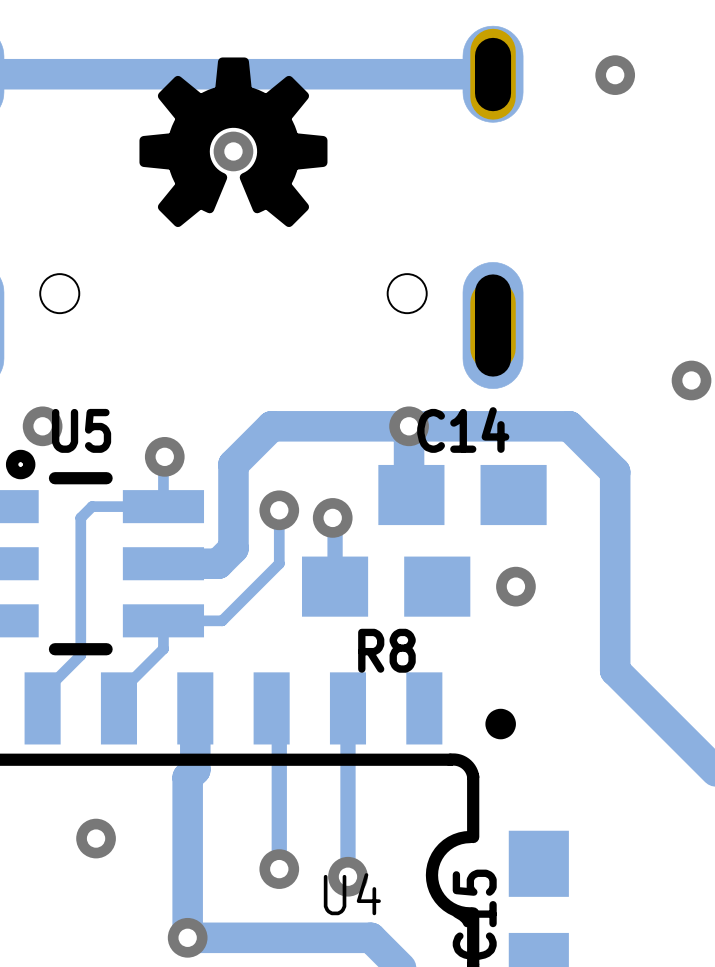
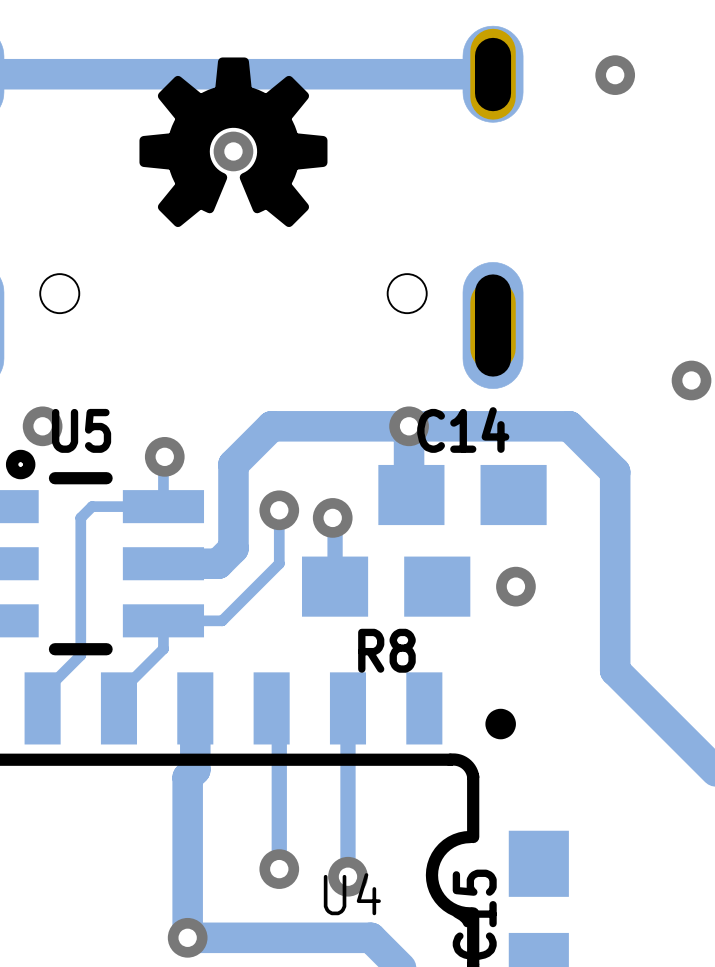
via: (96, 838) -> none

